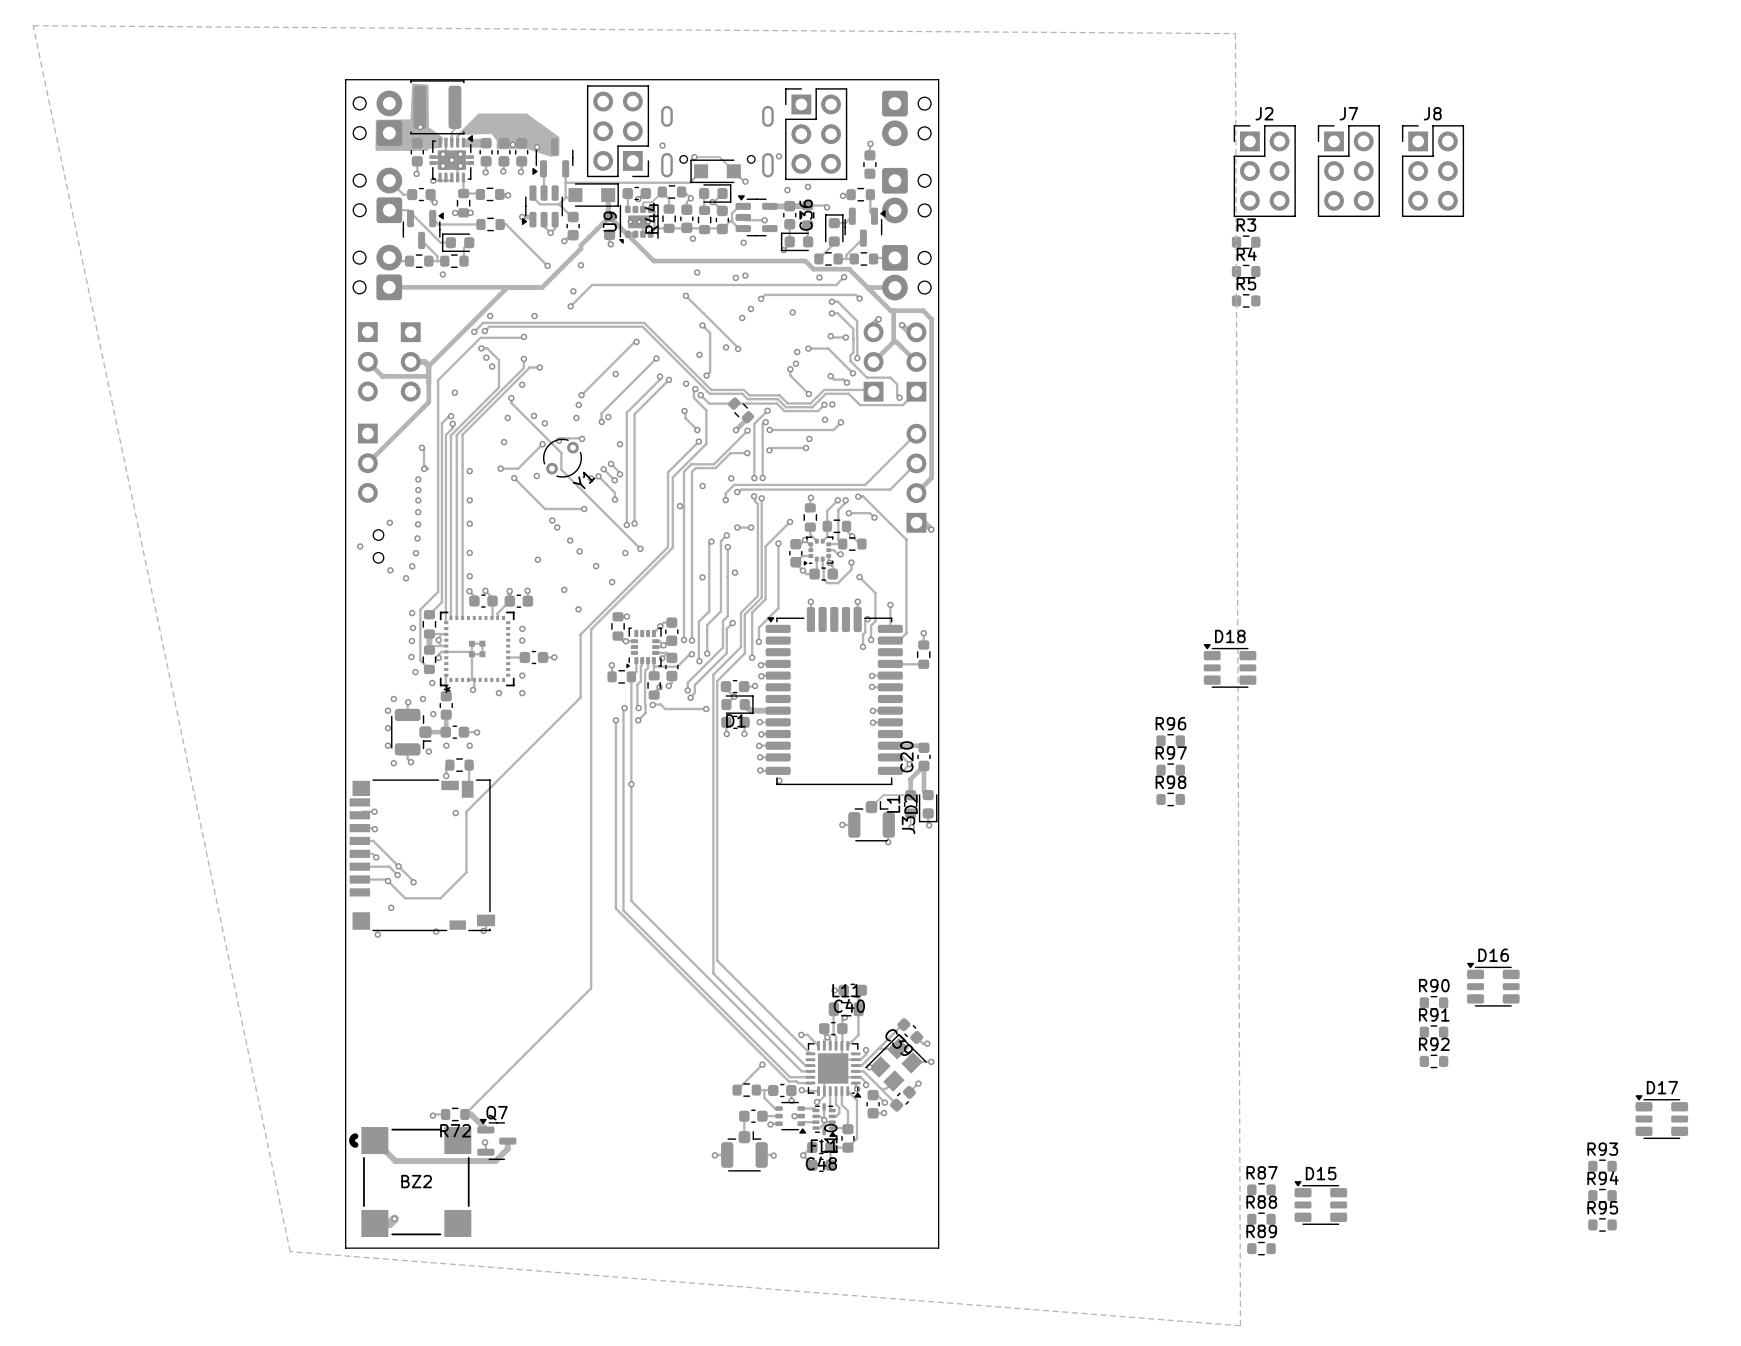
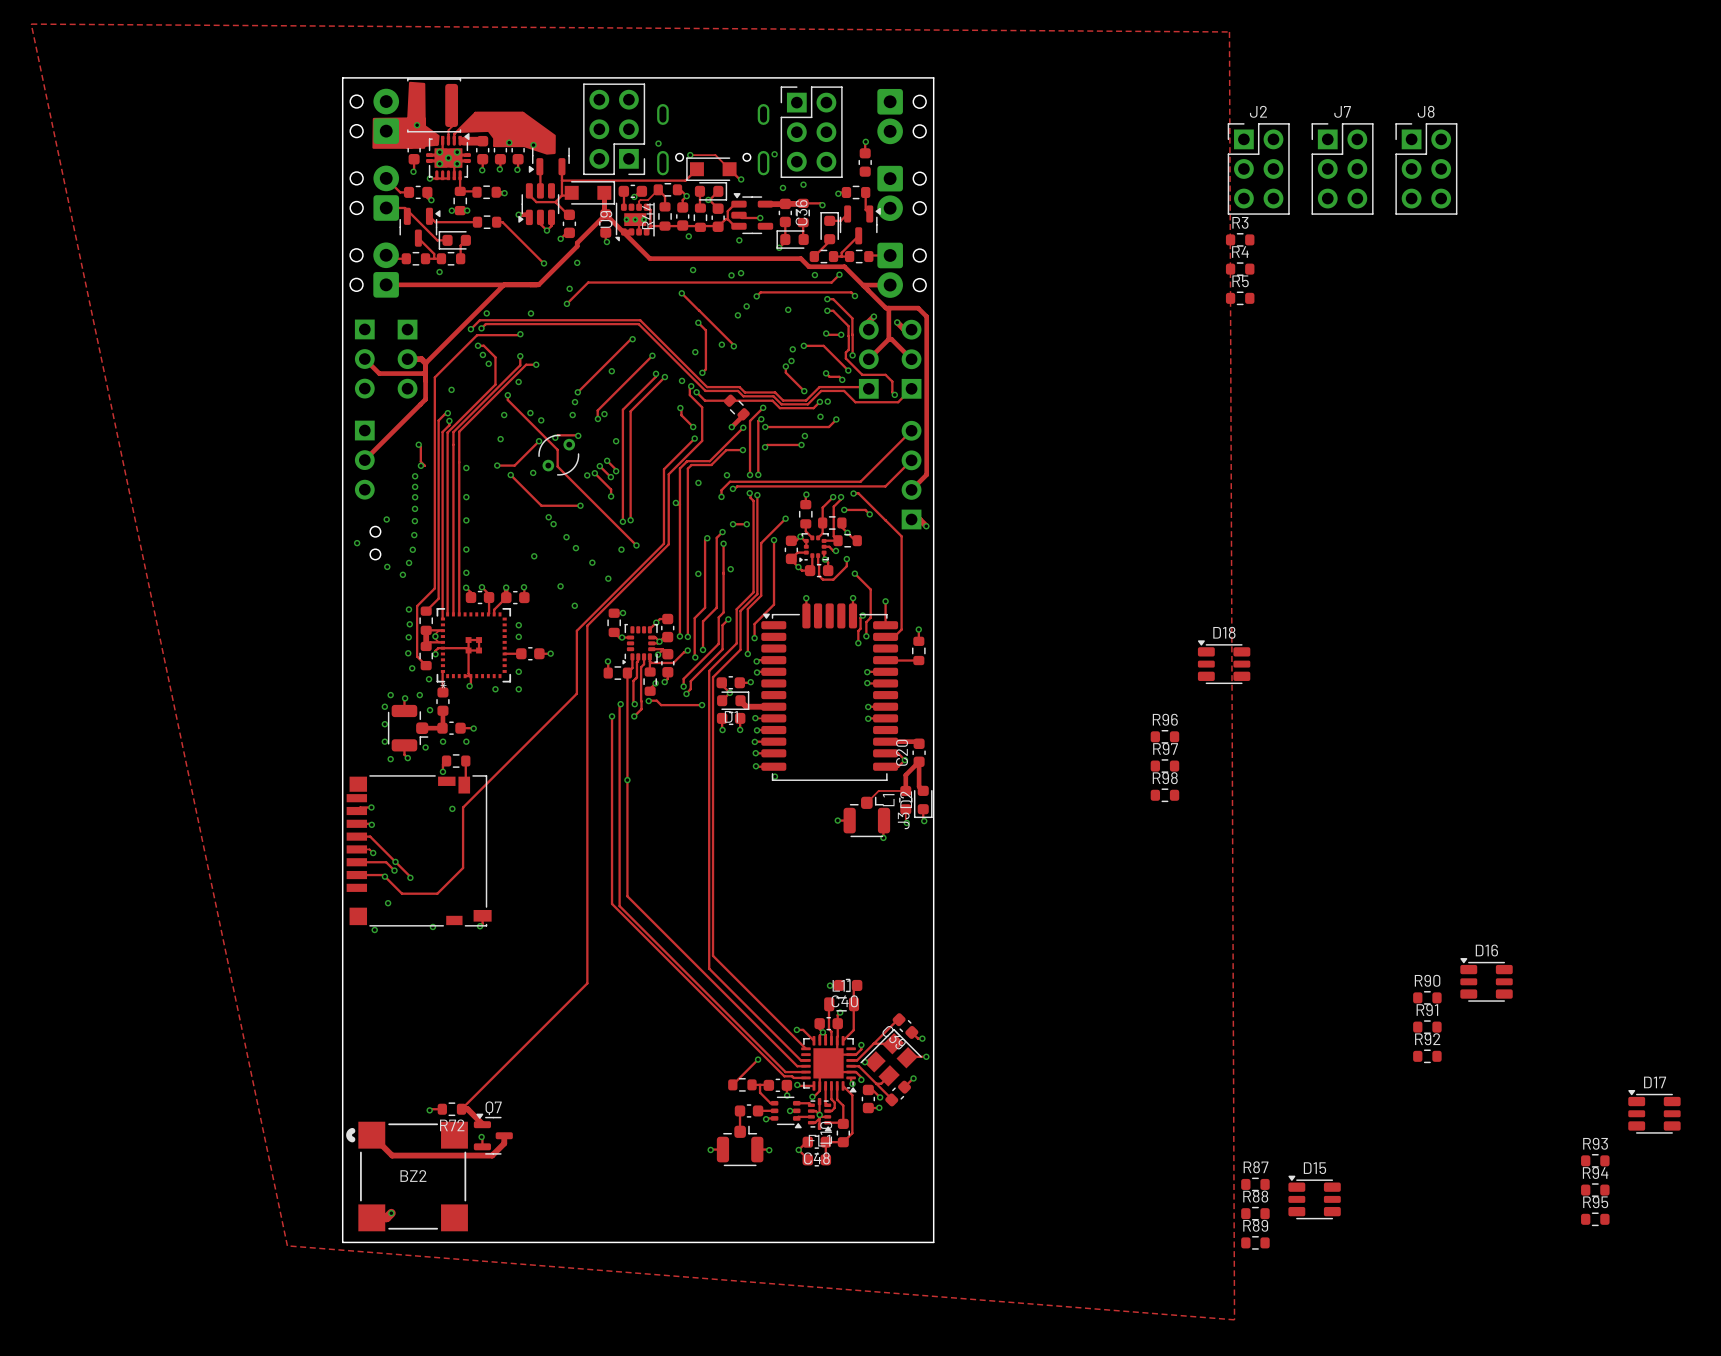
Y1: (562, 458) -> none
part: none -> (558, 455)

